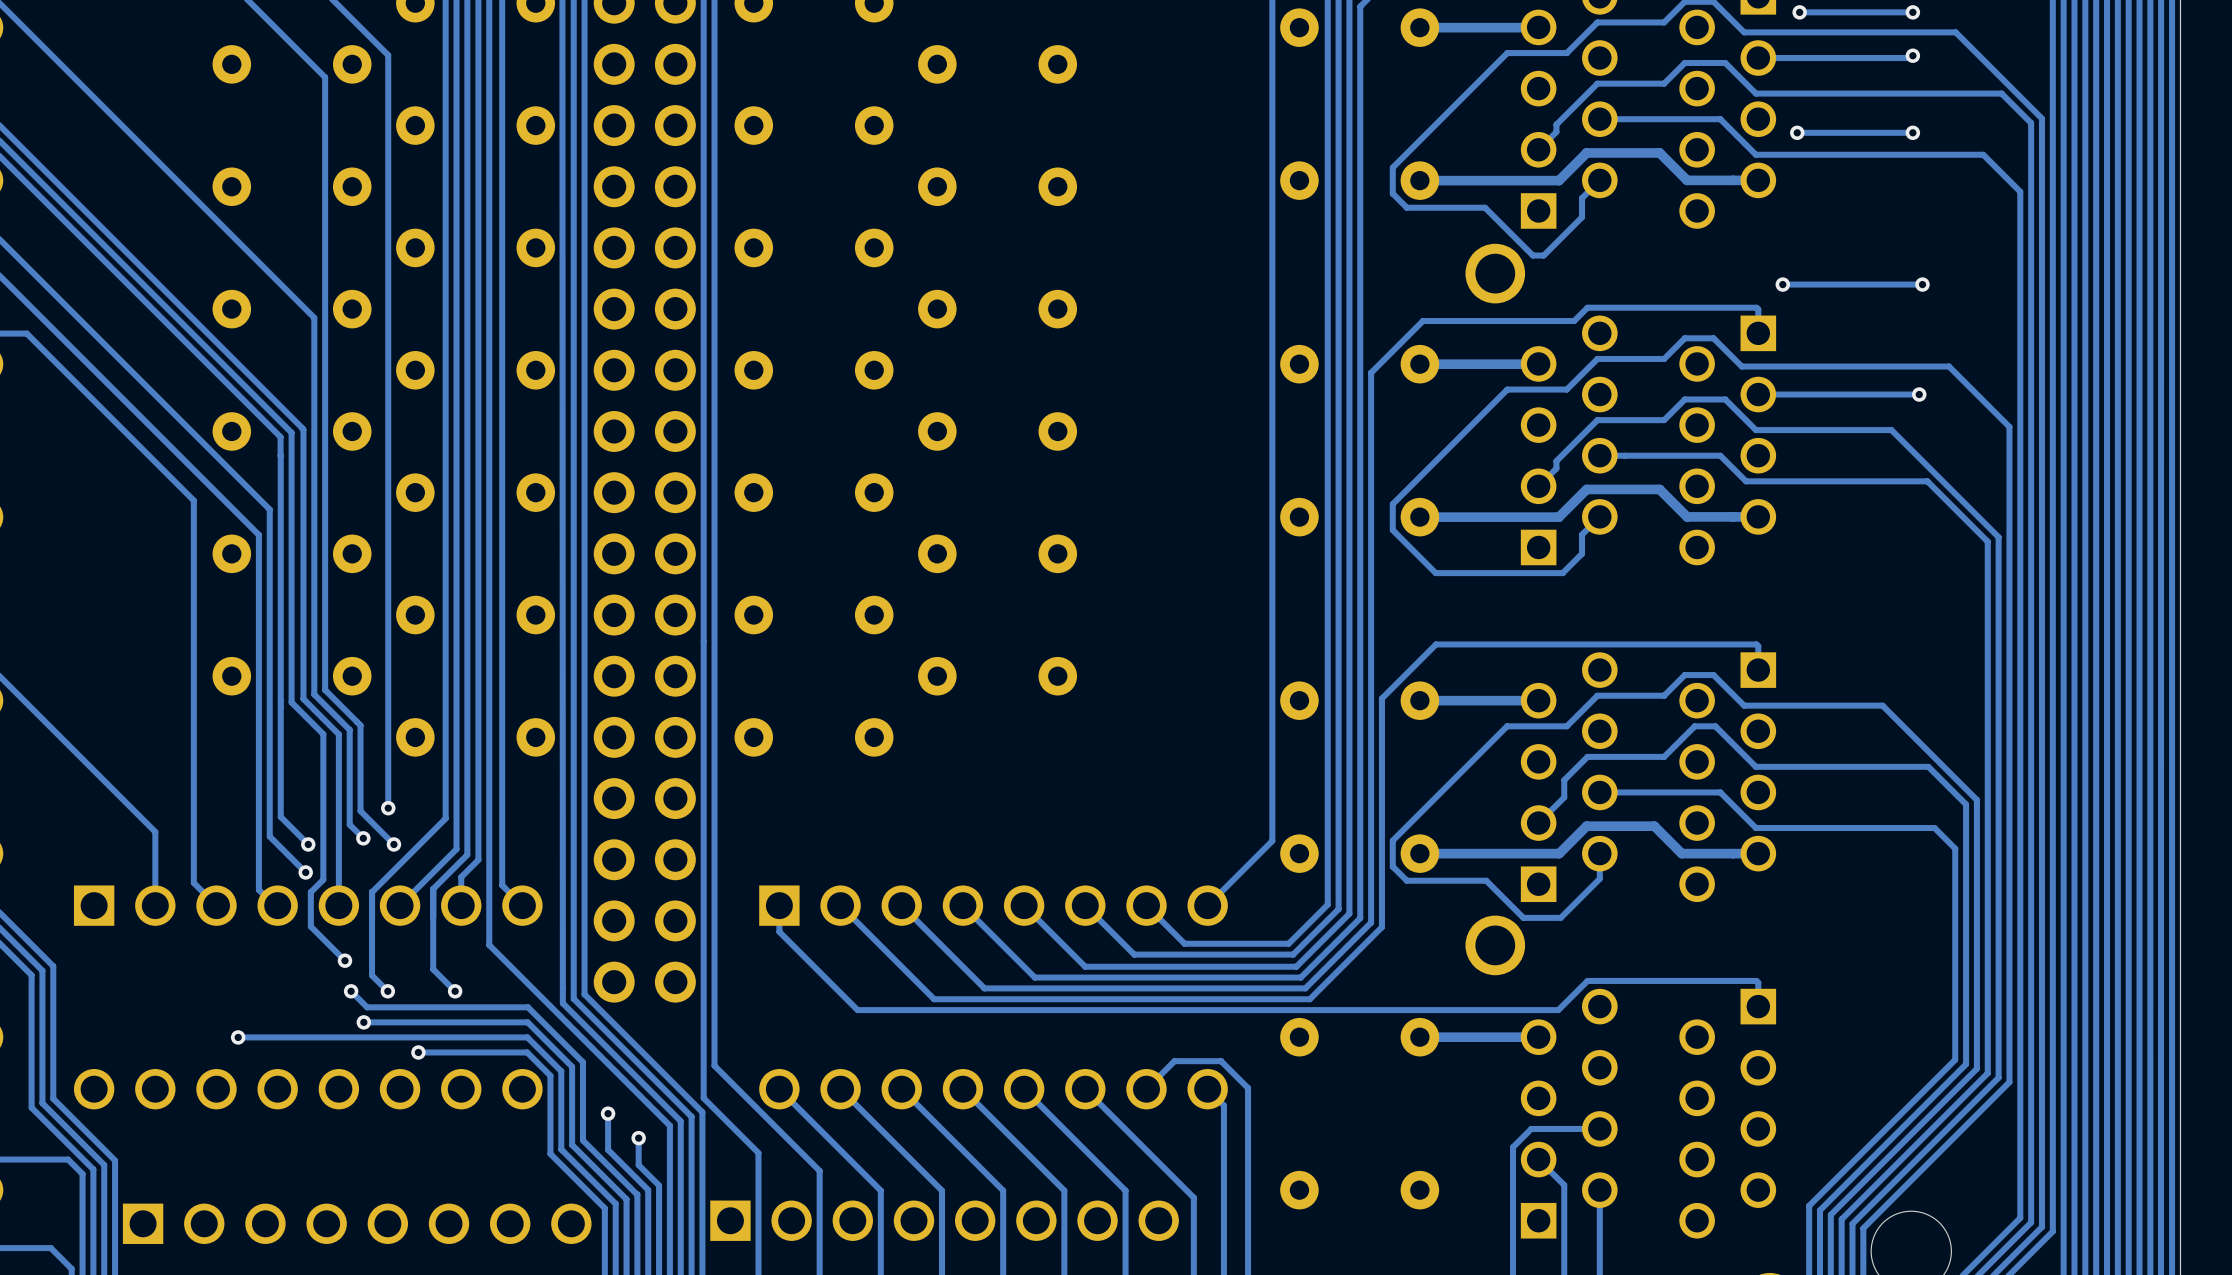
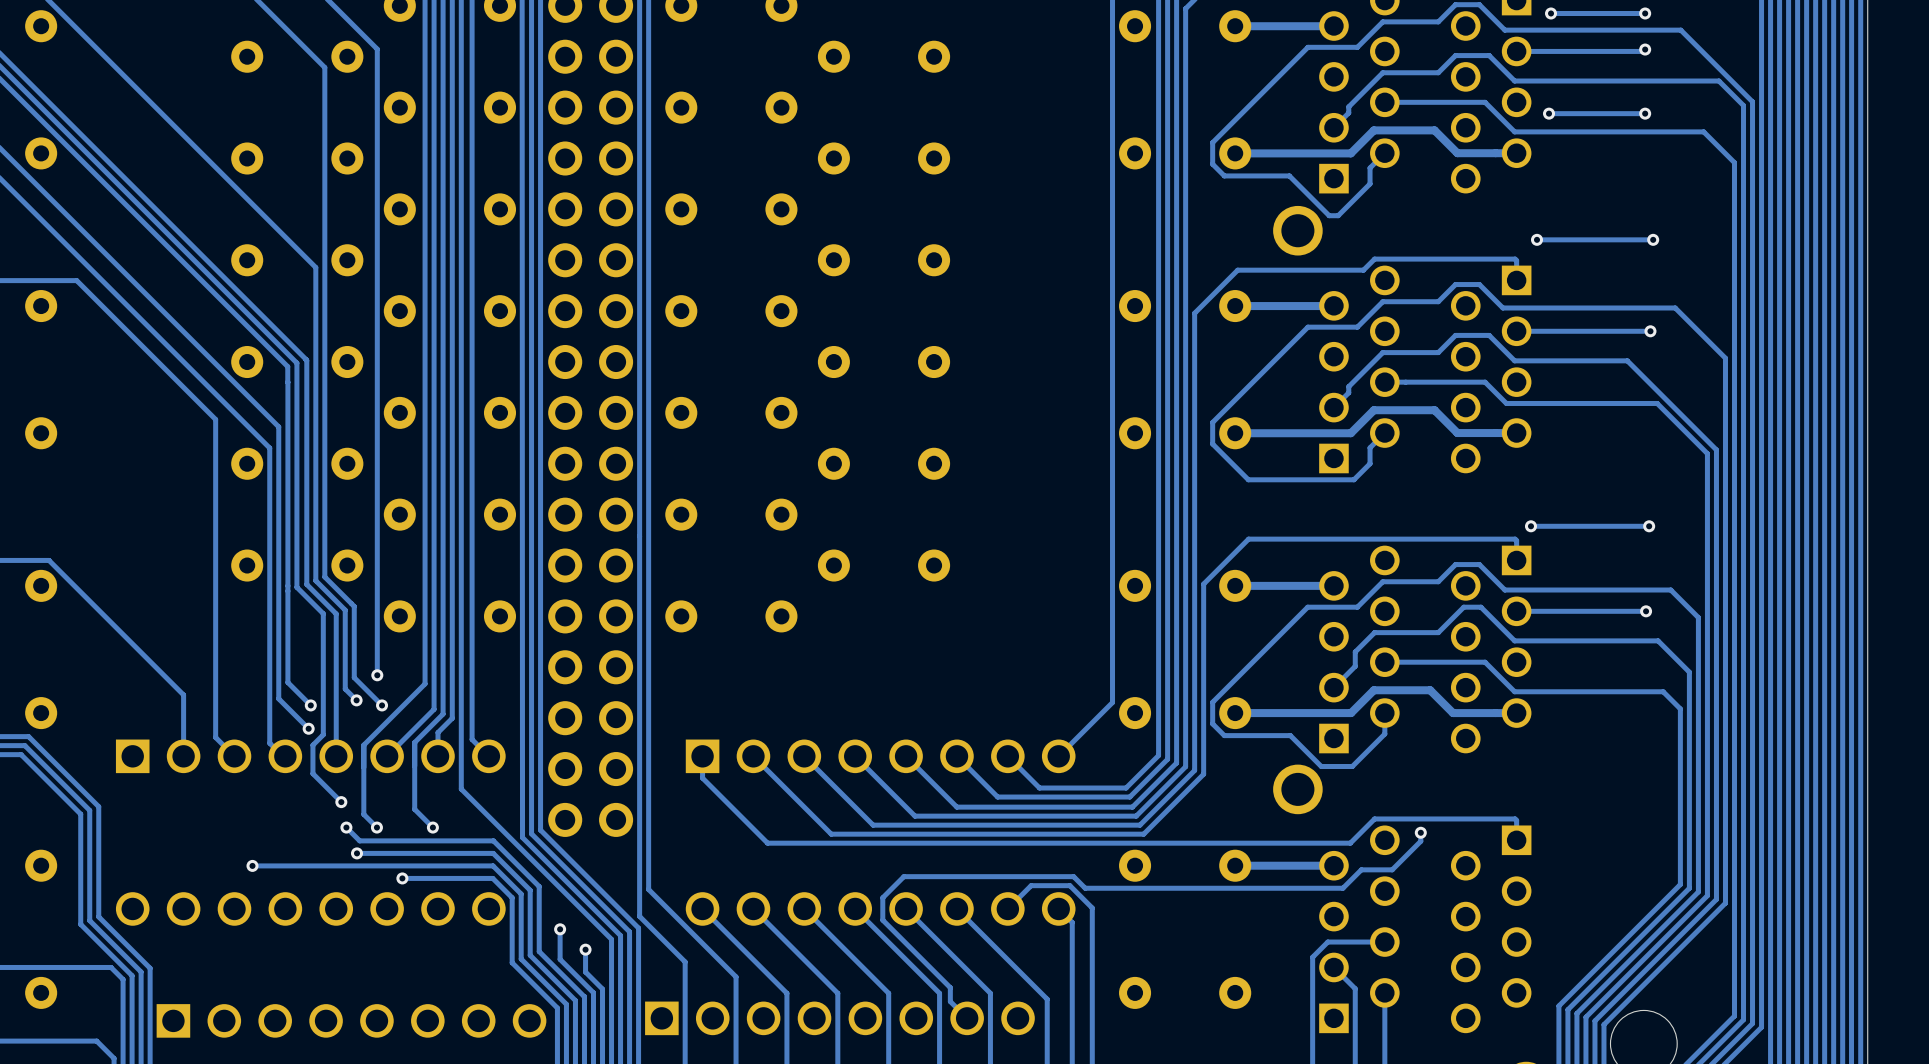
via: none -> (1530, 526)
track: none -> (1649, 526) (1530, 526)
via: none -> (1649, 526)
track: (1882, 705) (1976, 799) -> (1619, 590) (1670, 590) (1698, 617) (1698, 668)
track: none -> (1646, 611) (1516, 611)
via: none -> (1646, 611)
track: none -> (1420, 832) (1420, 841) (1392, 869) (1361, 869) (1342, 888) (1085, 888) (1073, 876) (903, 876) (882, 897) (882, 920) (950, 987) (950, 1001) (967, 1018)
via: none -> (1420, 832)

